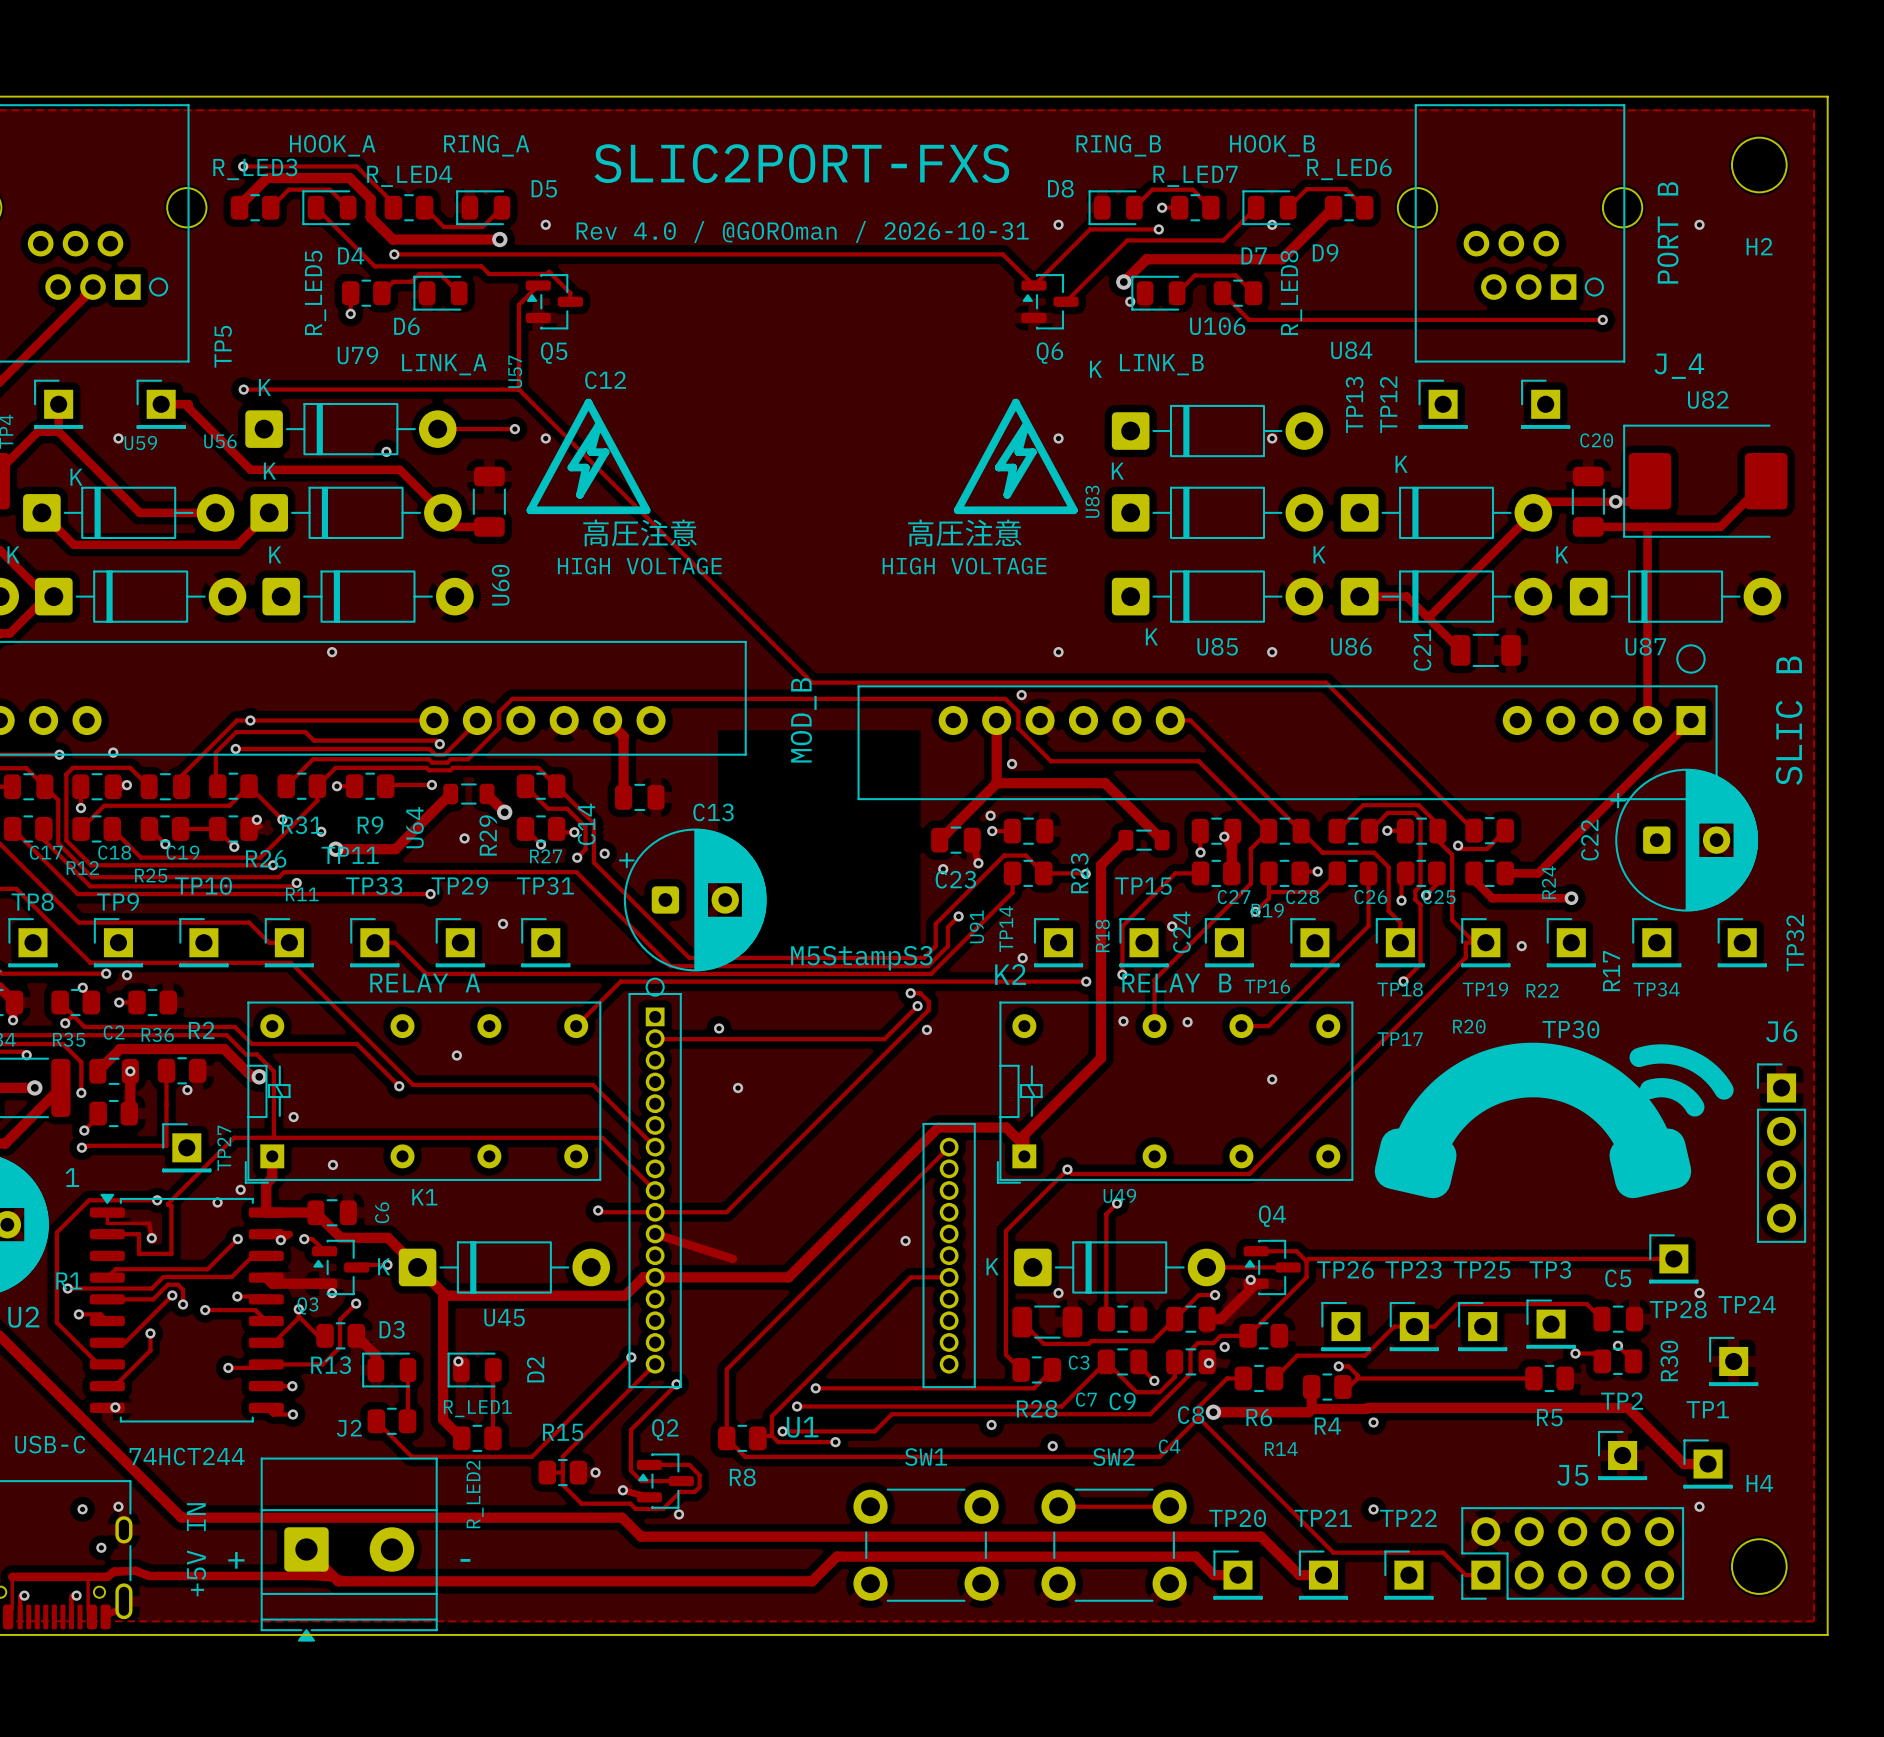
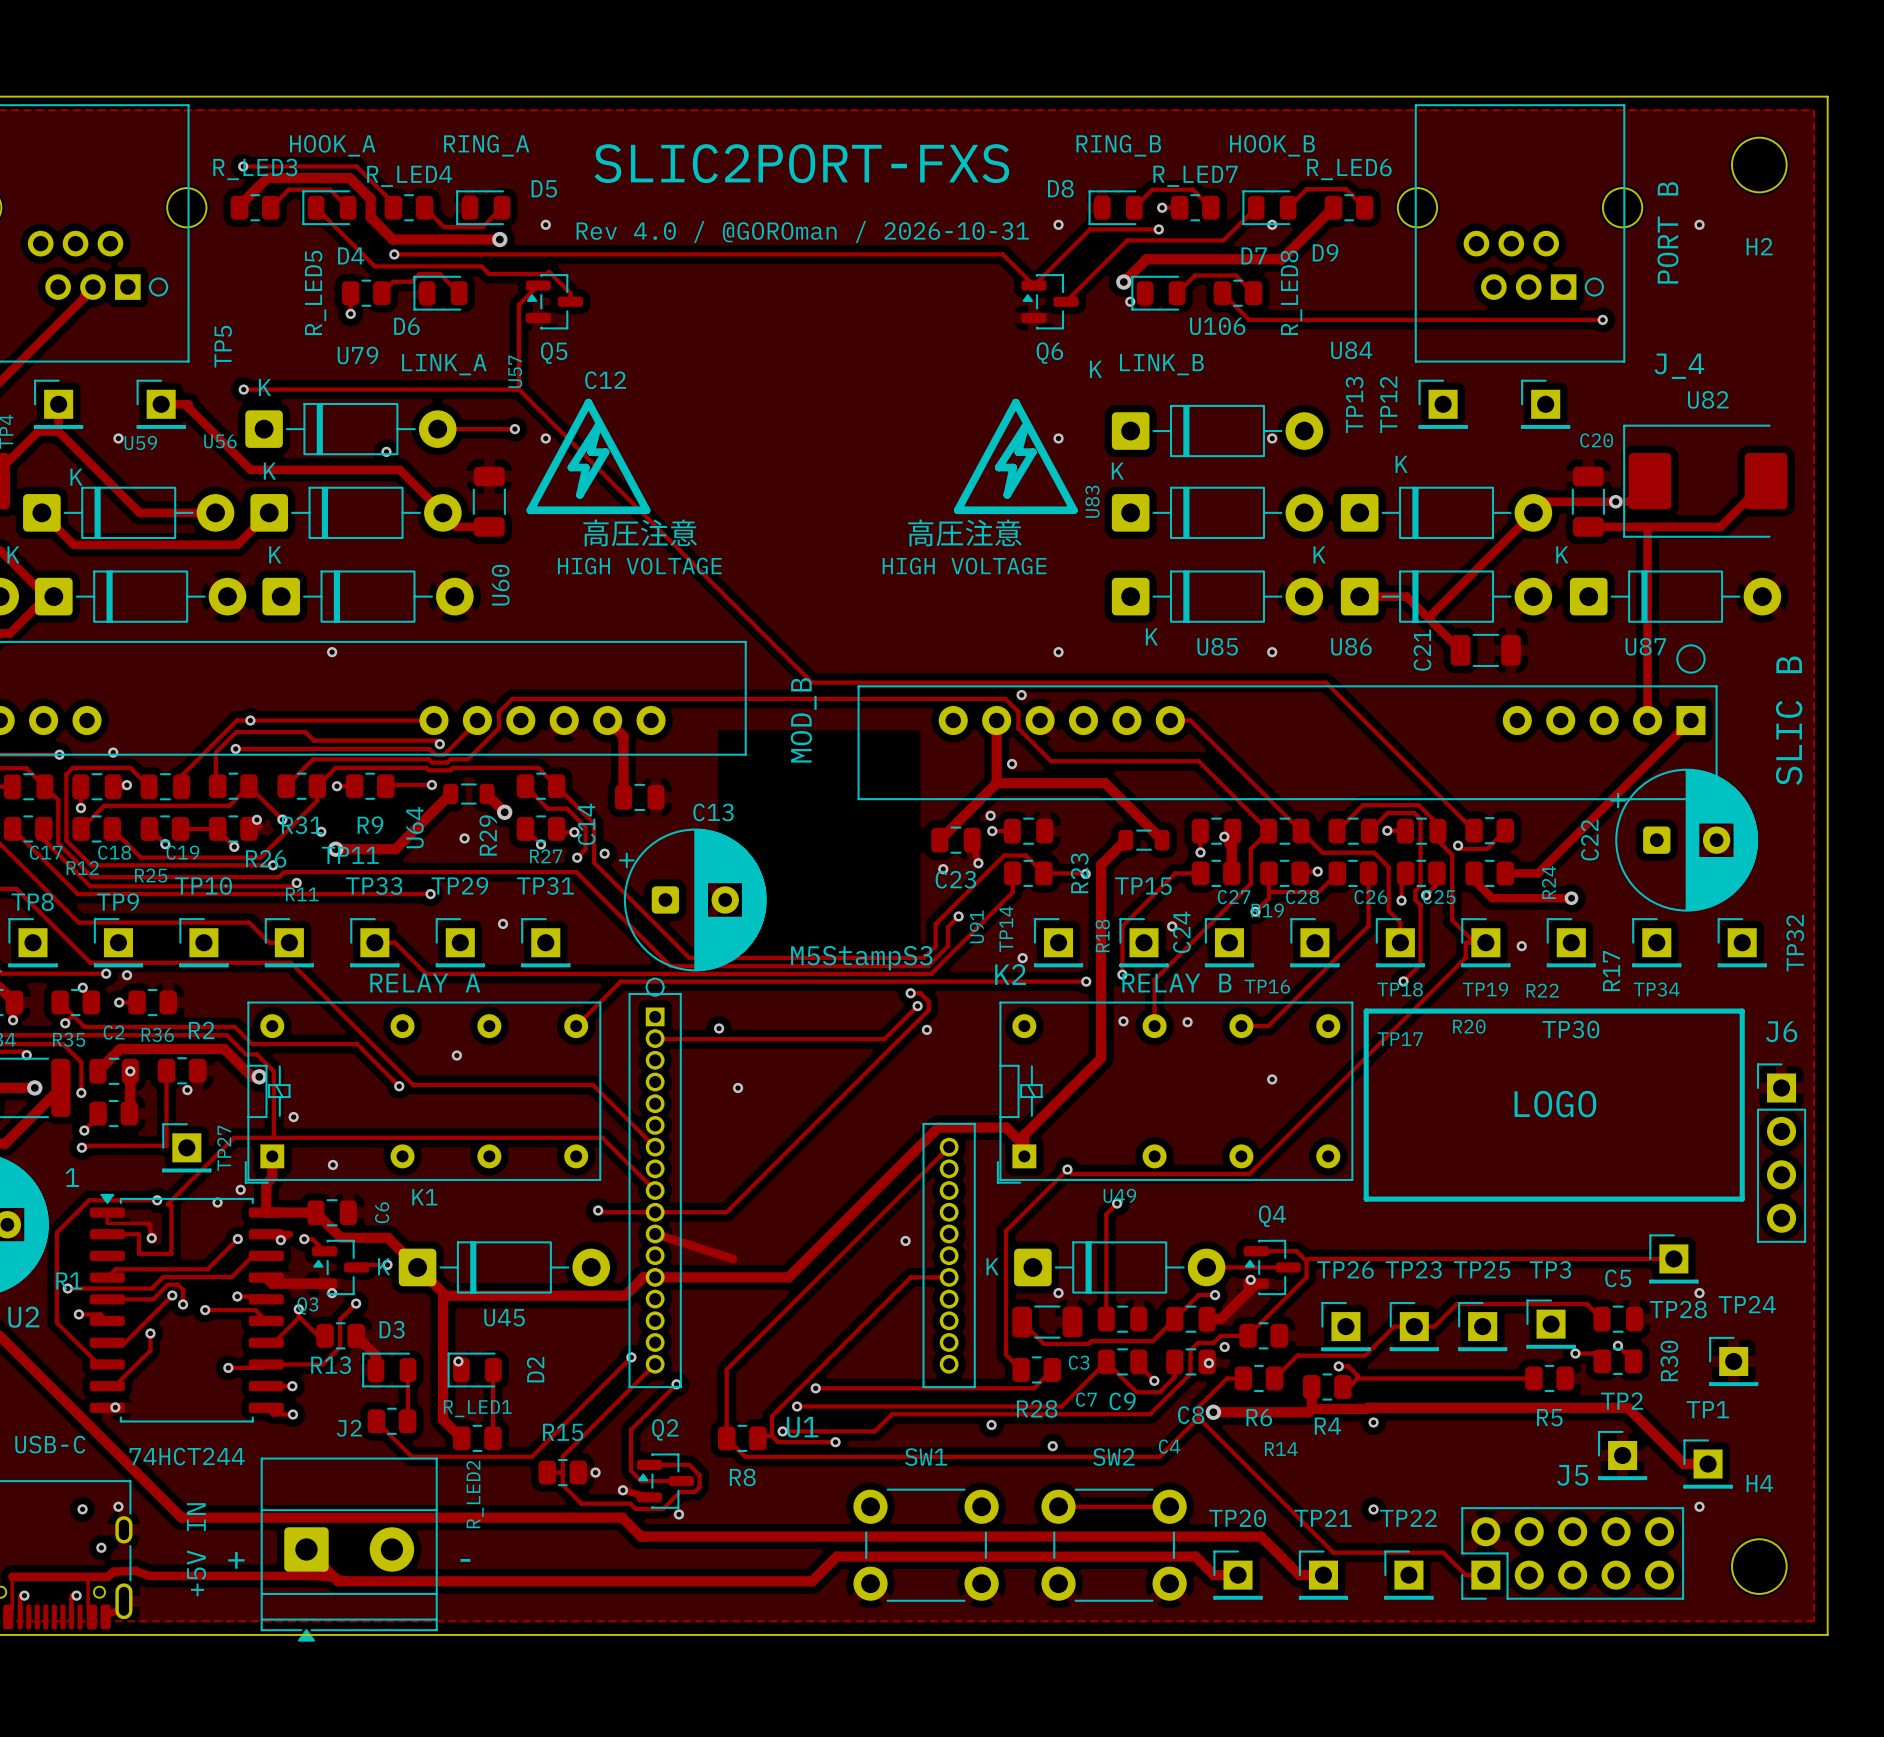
line: none -> (1366, 1011) (1742, 1011) (1742, 1199) (1366, 1199) (1366, 1011)
drawing: [1374, 1042, 1734, 1199] -> none
text: none -> LOGO (1555, 1104)

